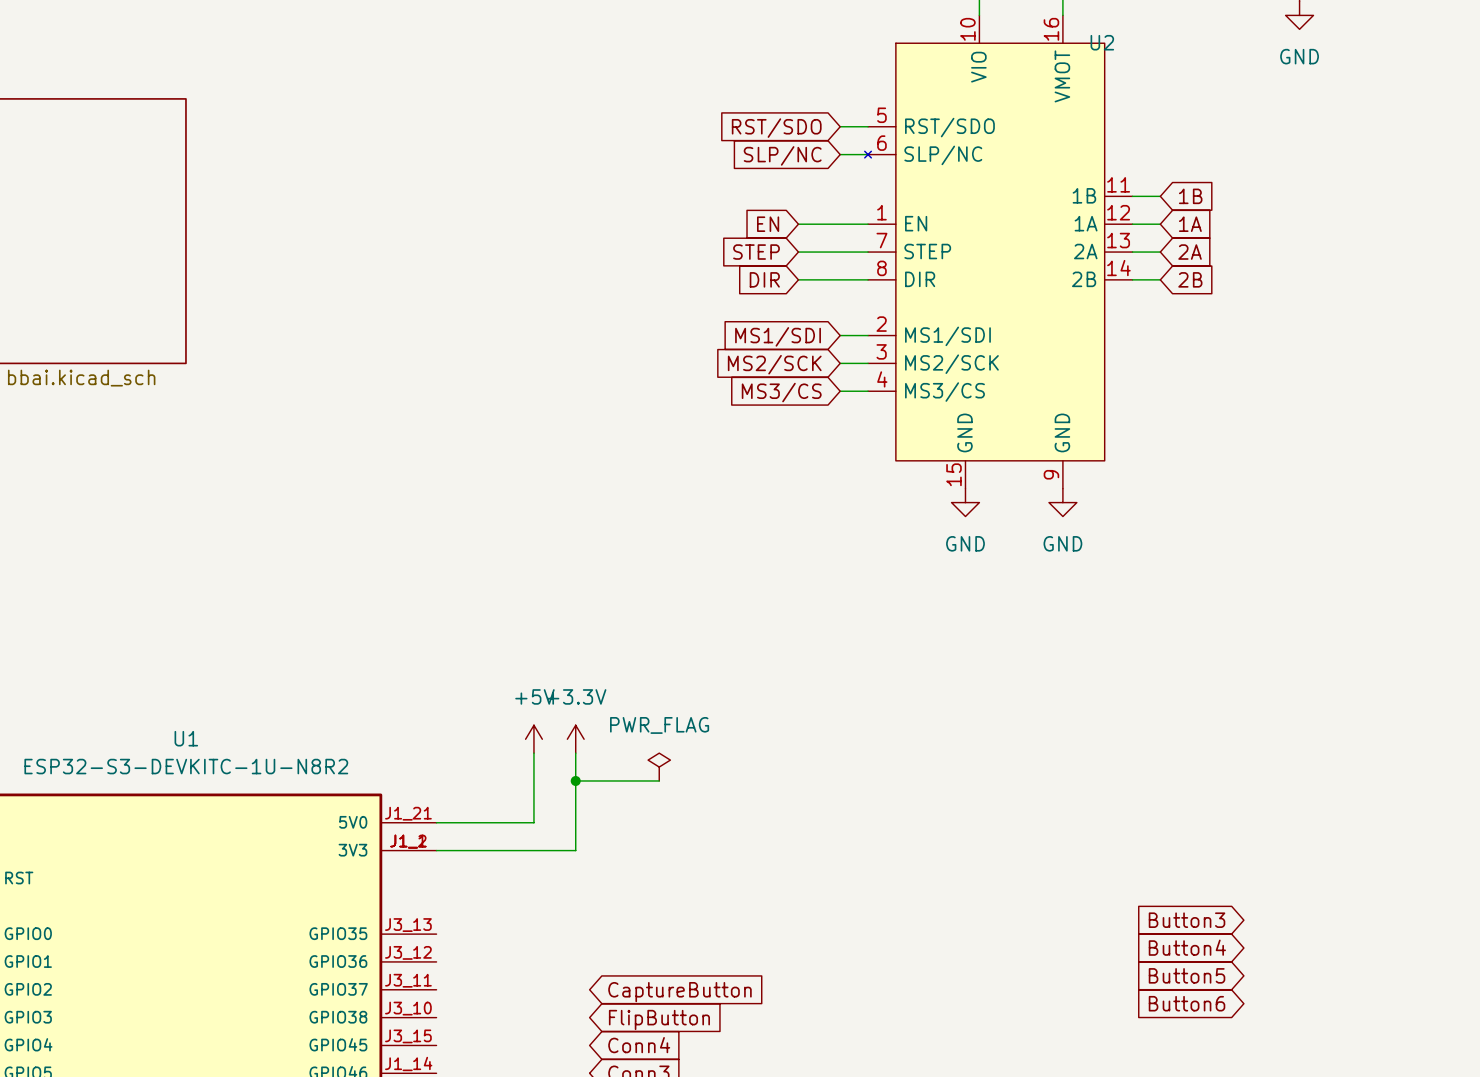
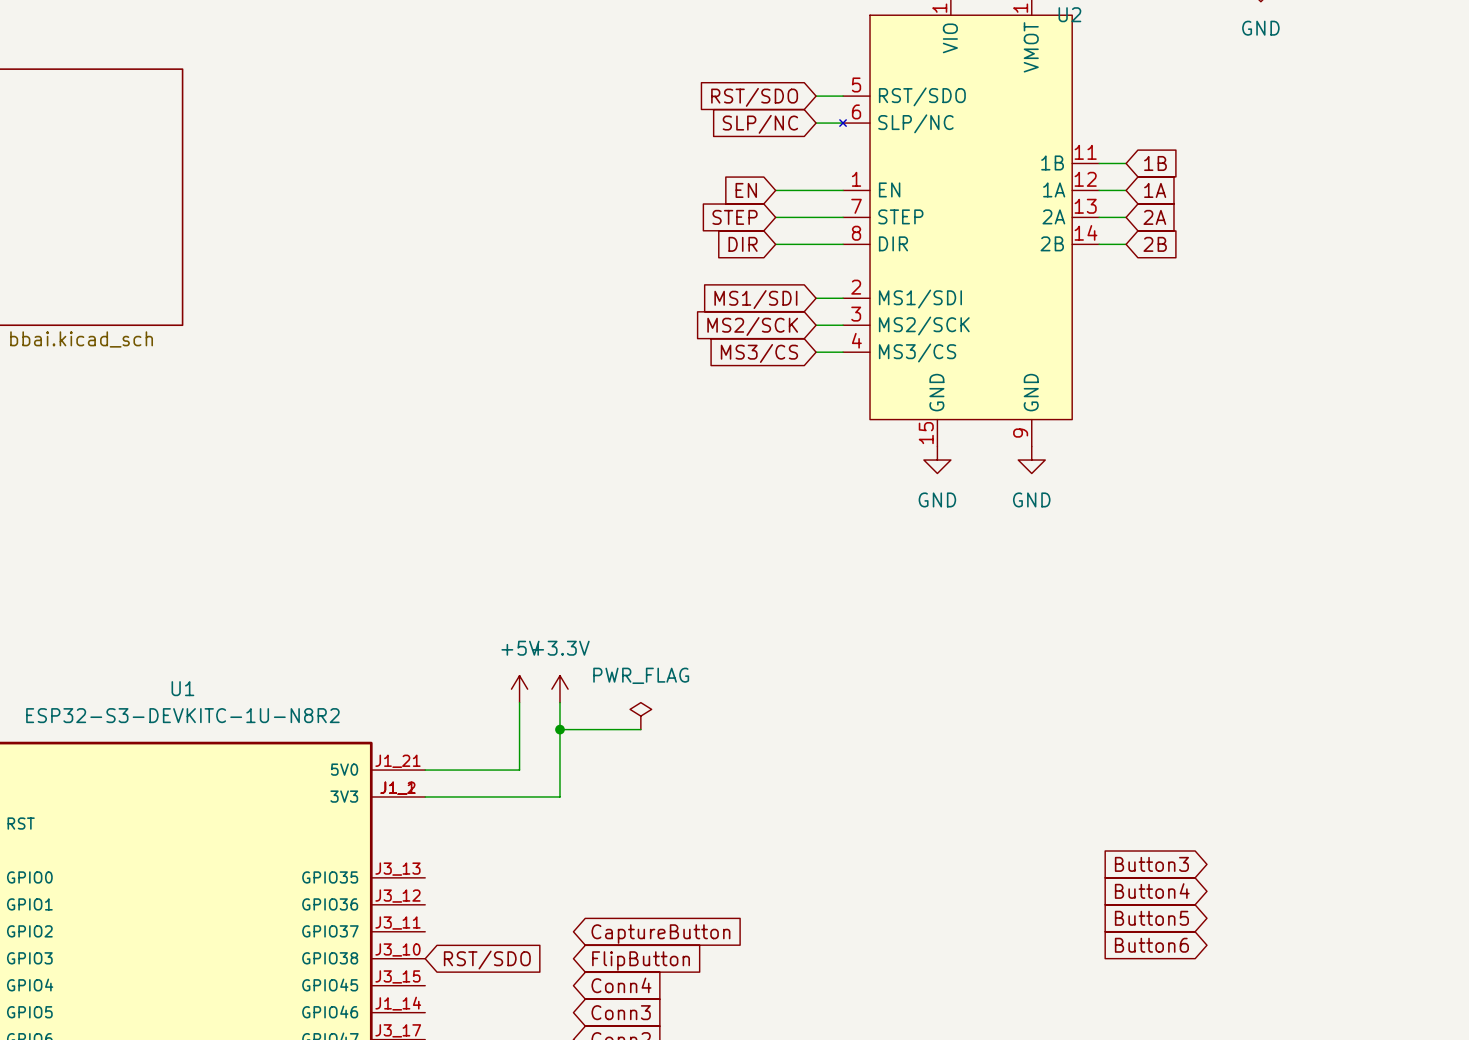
global label: none -> RST/SDO (487, 960)

